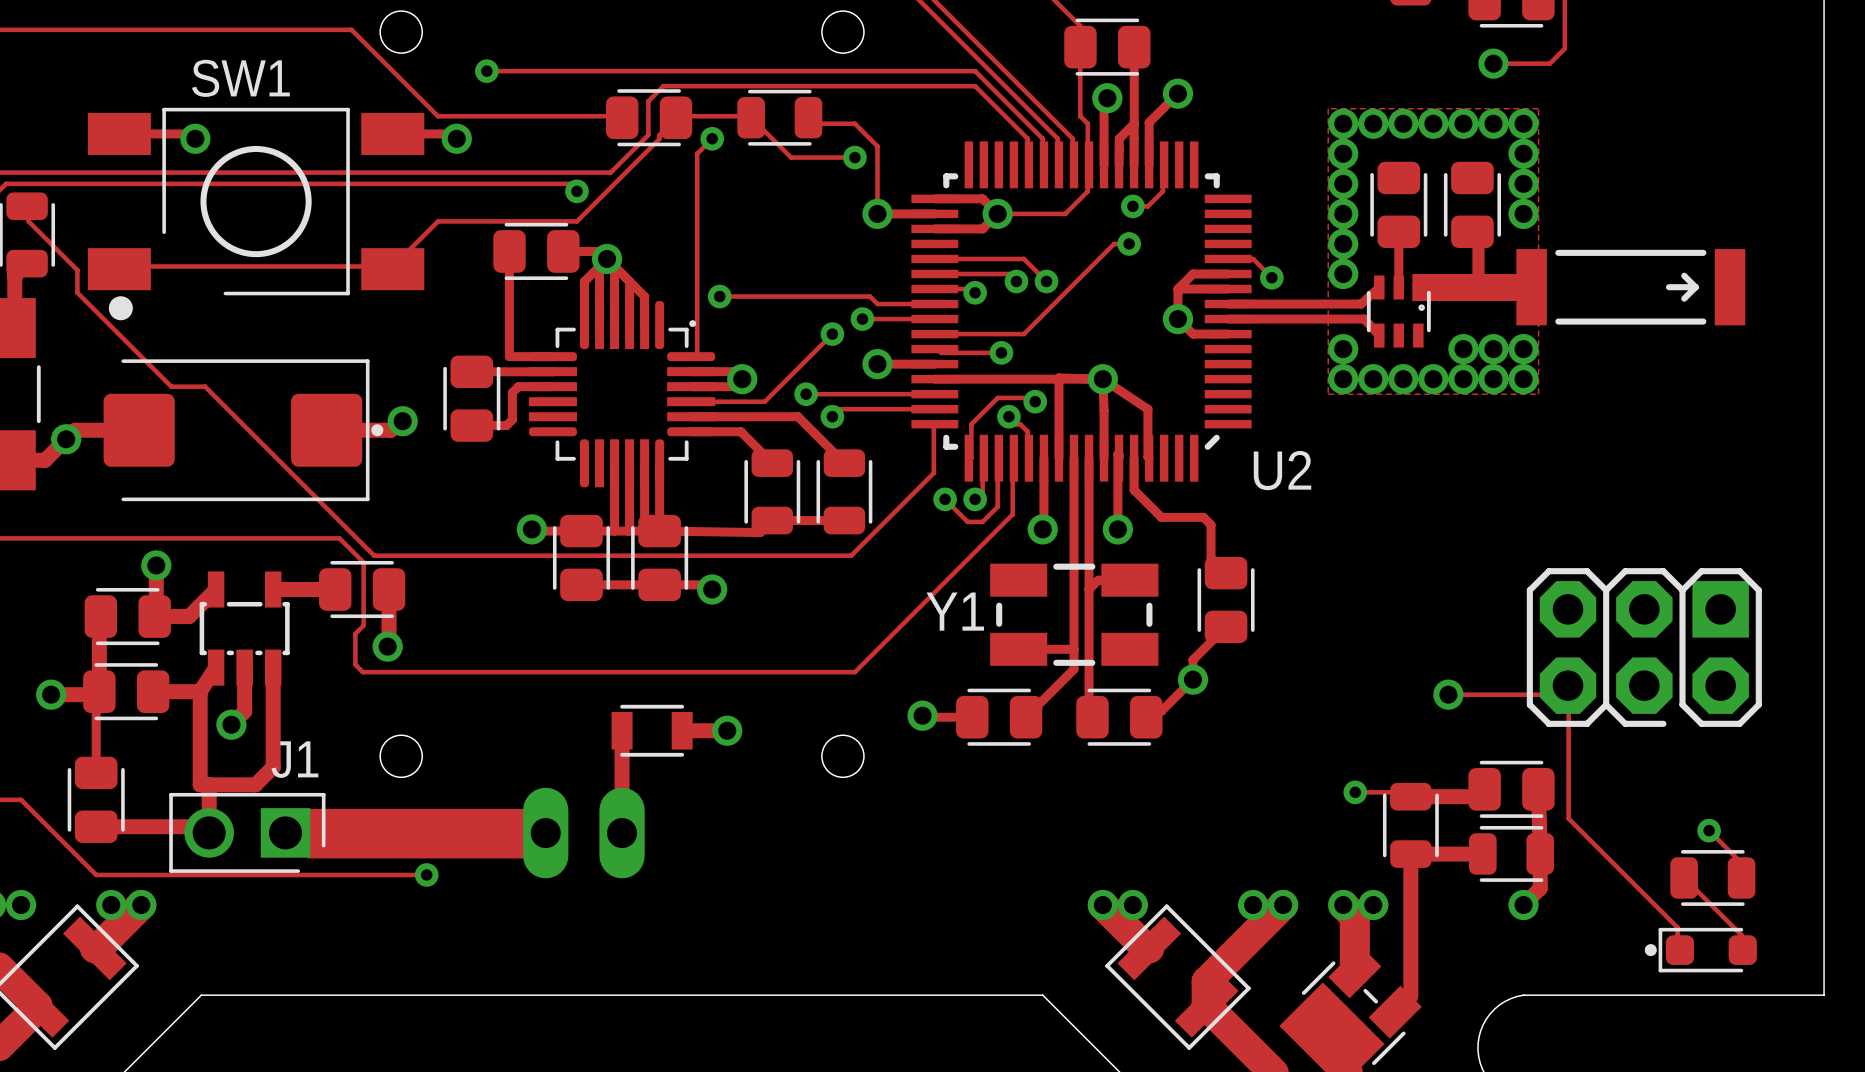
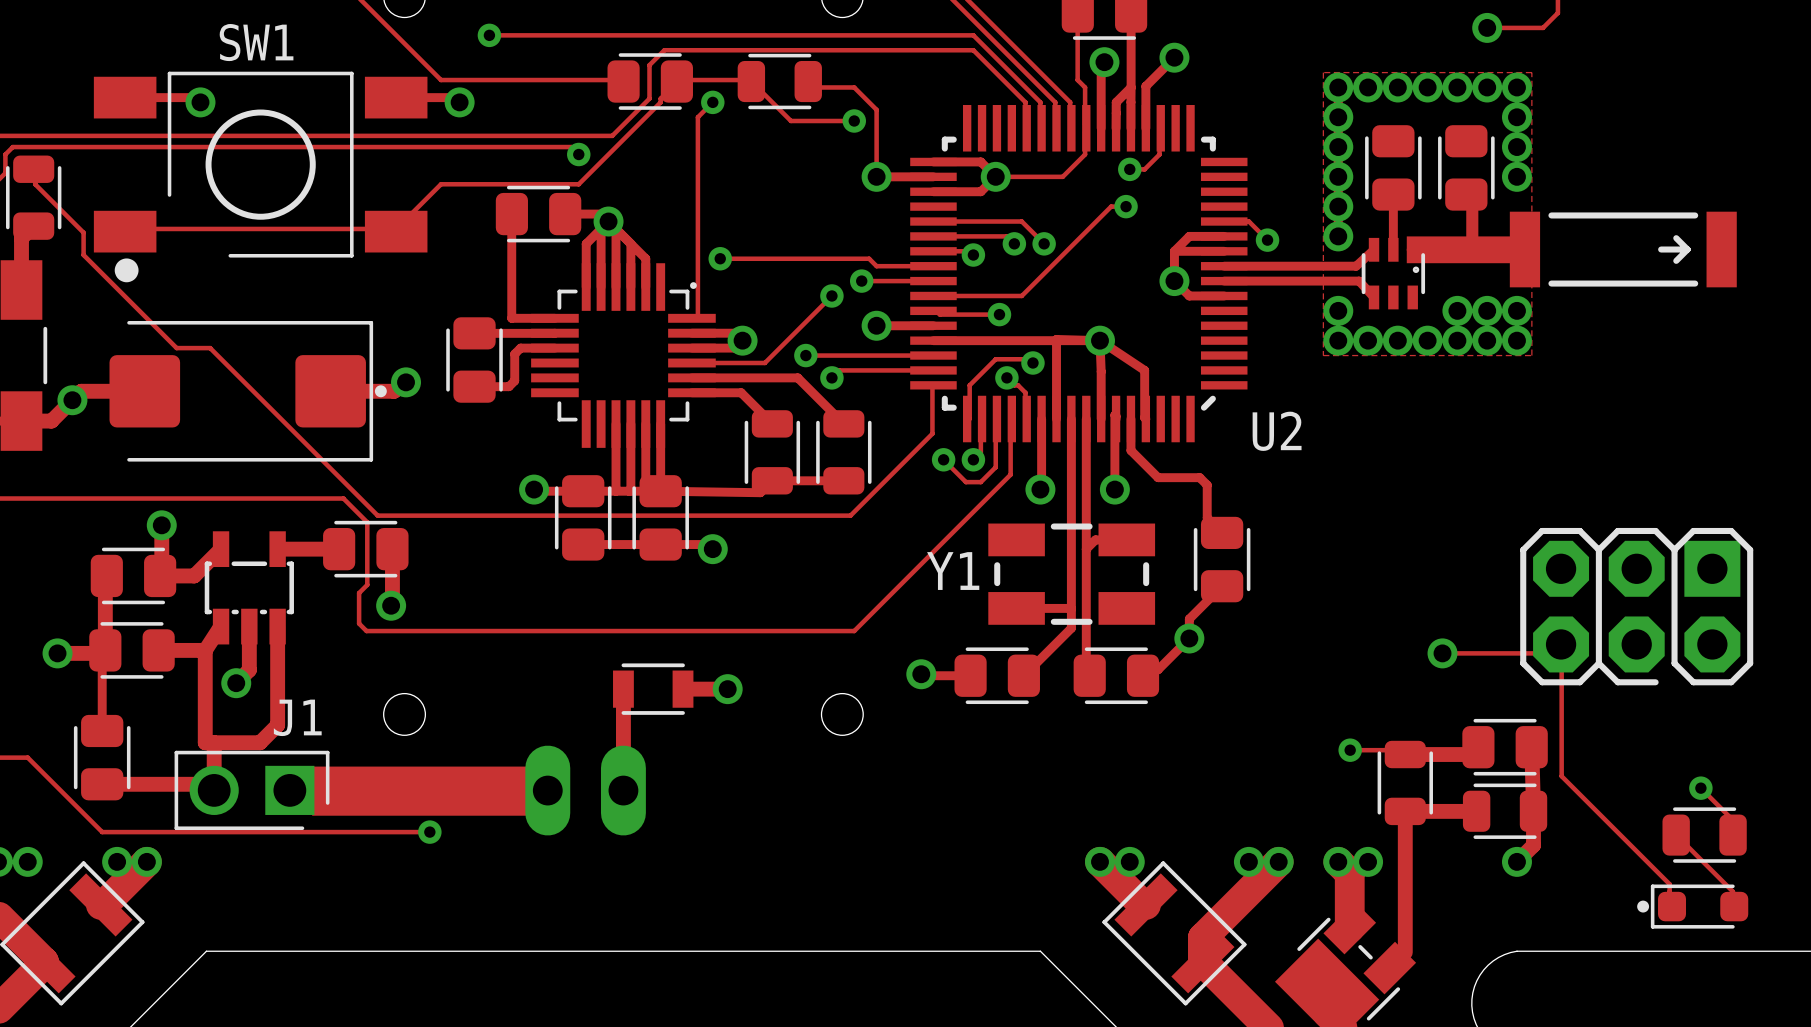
part footprint: [528, 301, 716, 488] -> [531, 263, 716, 448]

